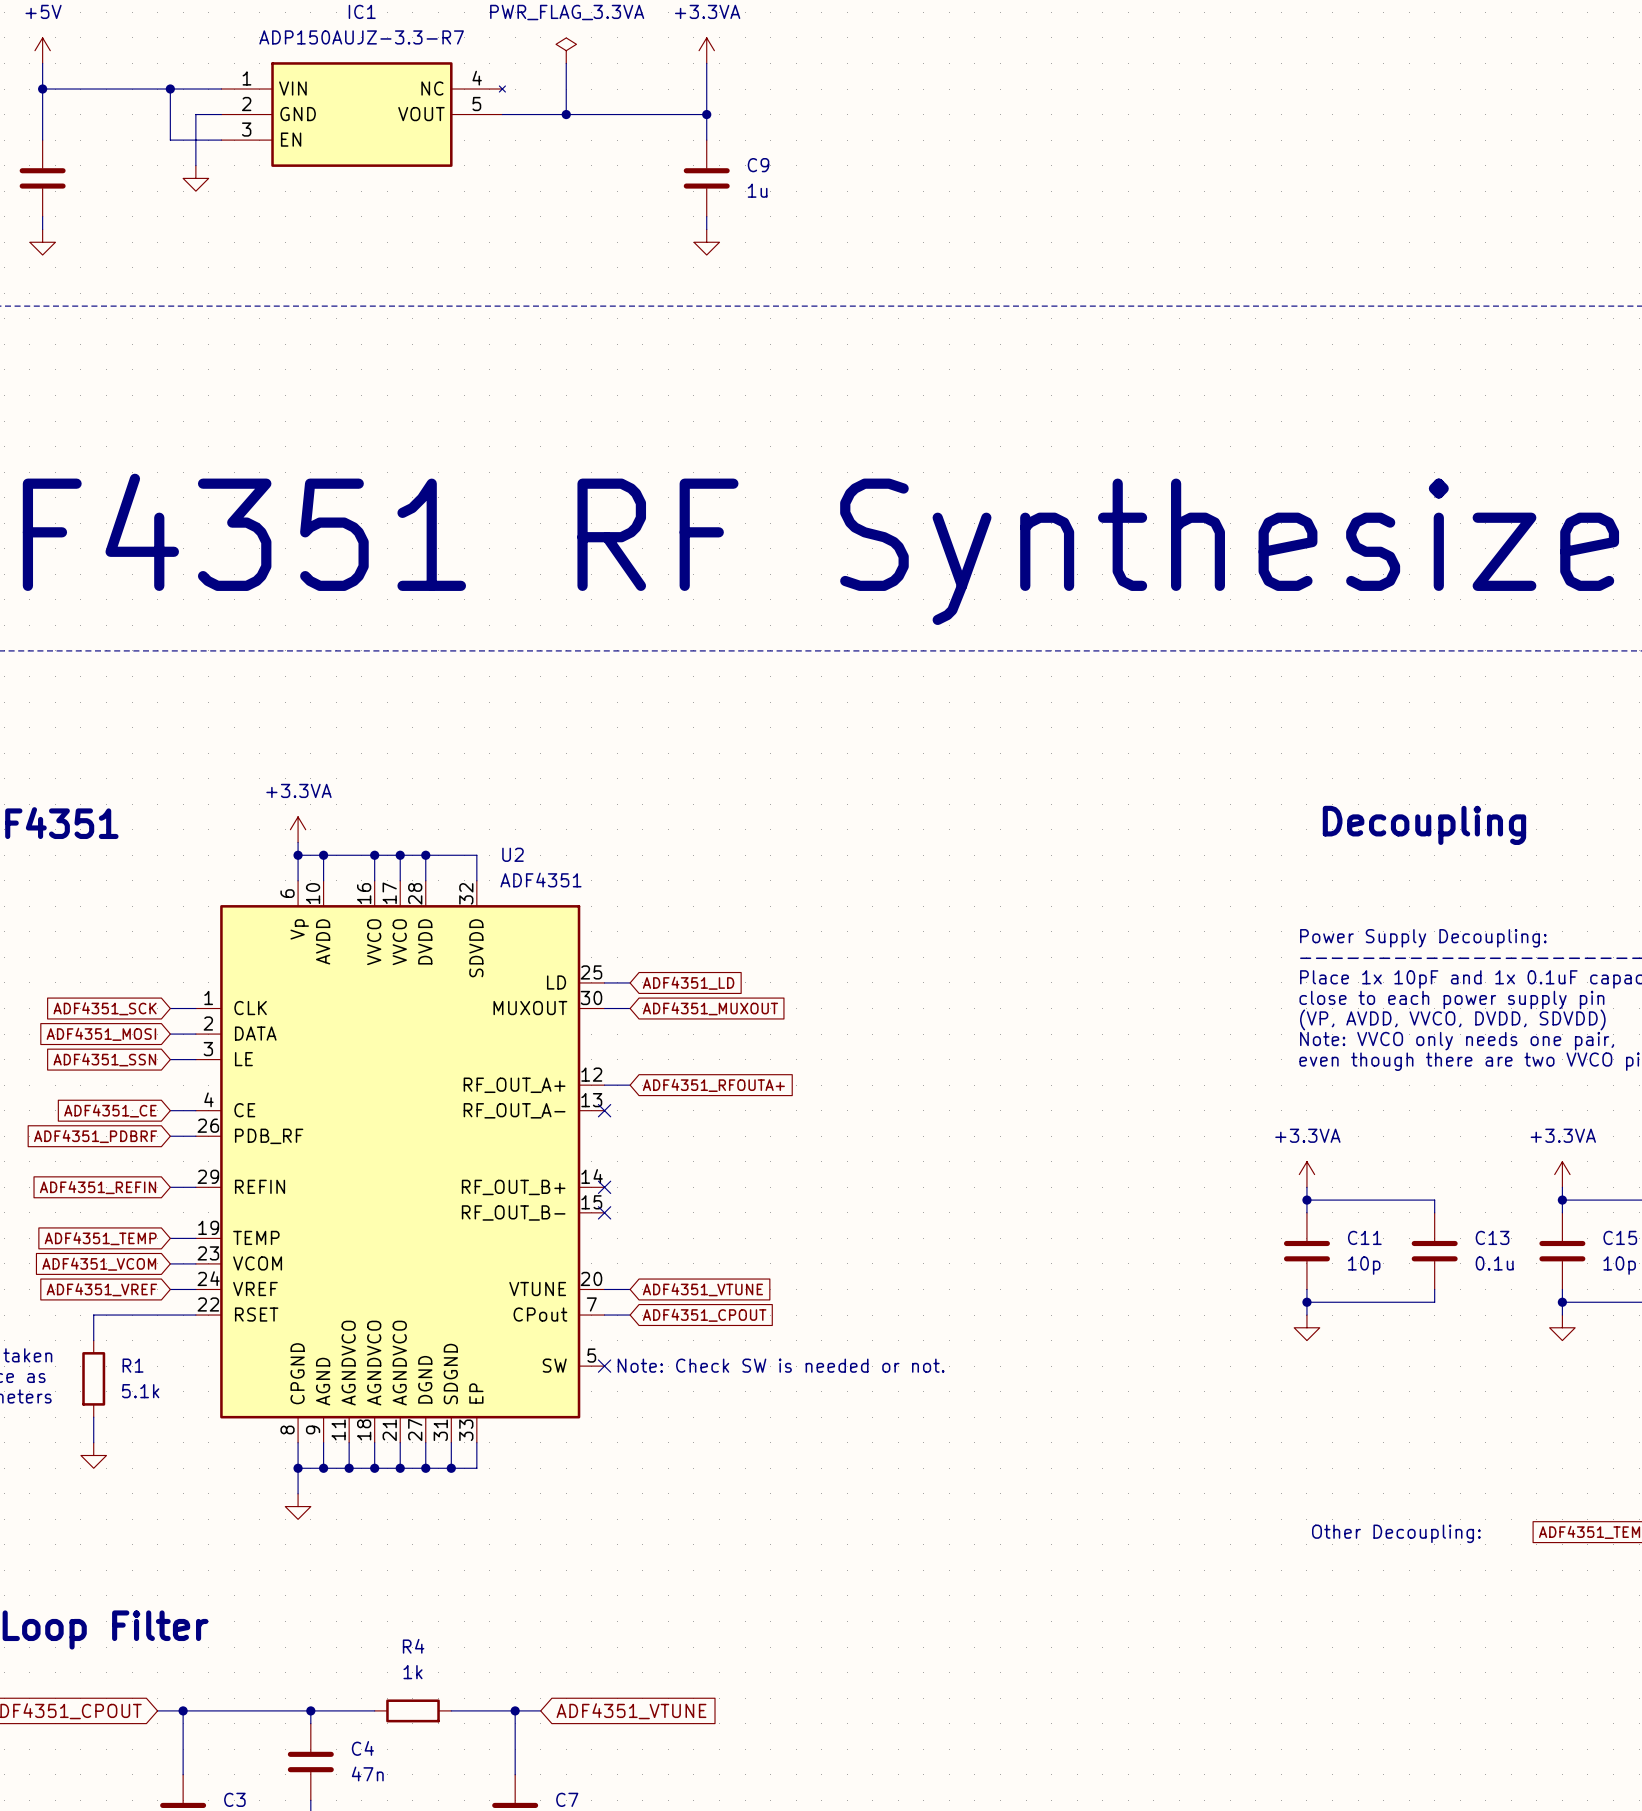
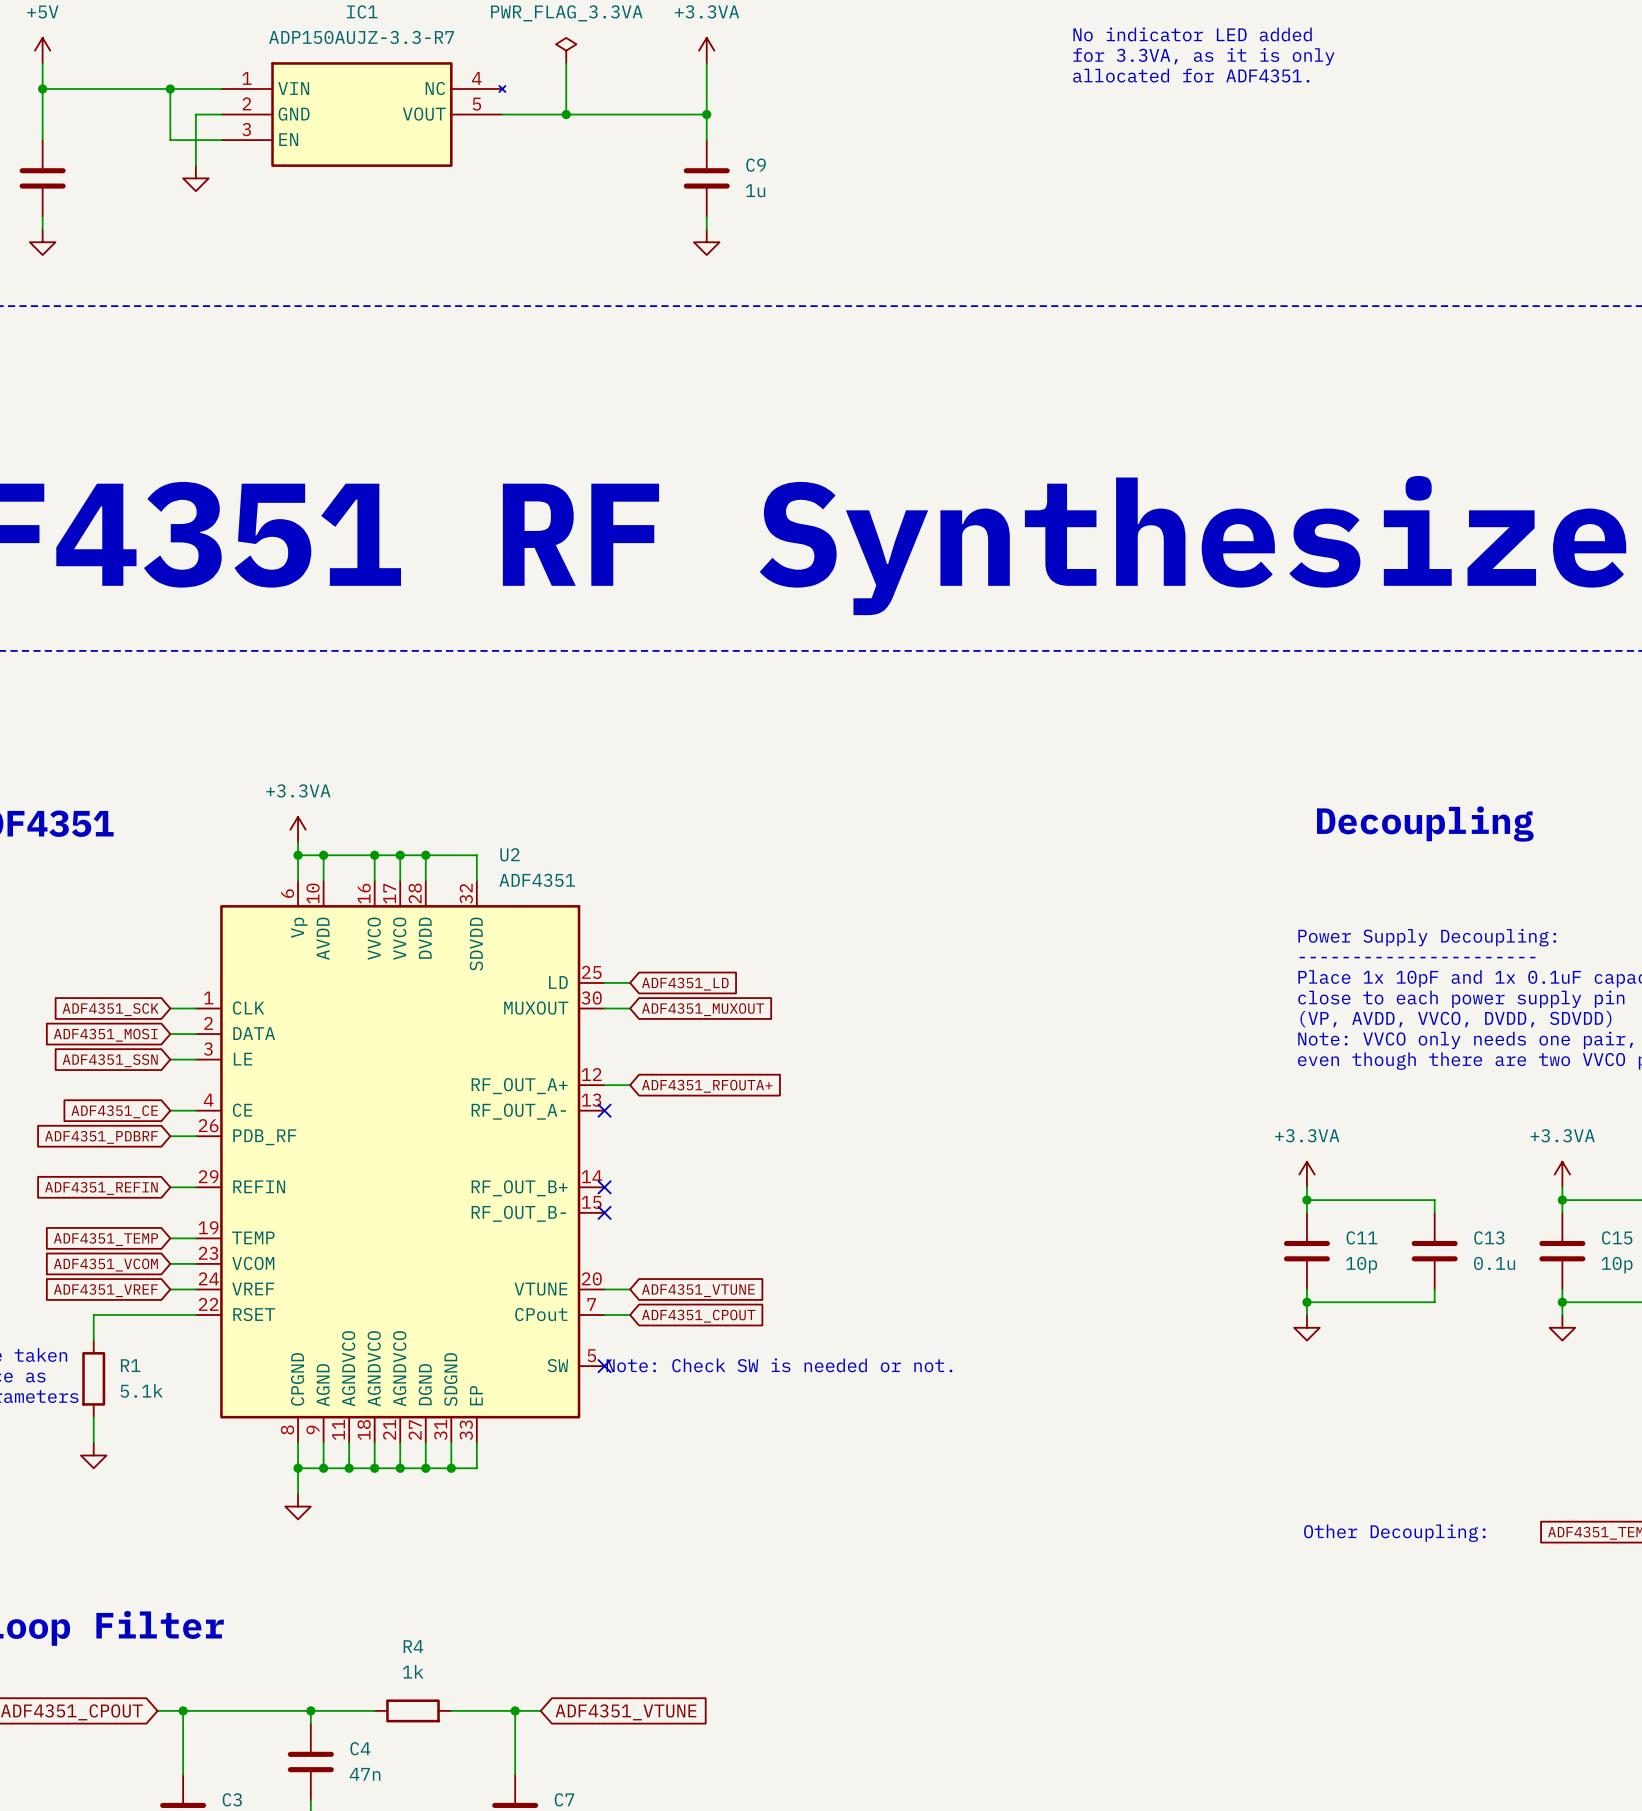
text: none -> No indicator LED added (1192, 34)
text: none -> for 3.3VA, as it is only (1203, 56)
text: none -> allocated for ADF4351. (1191, 75)

